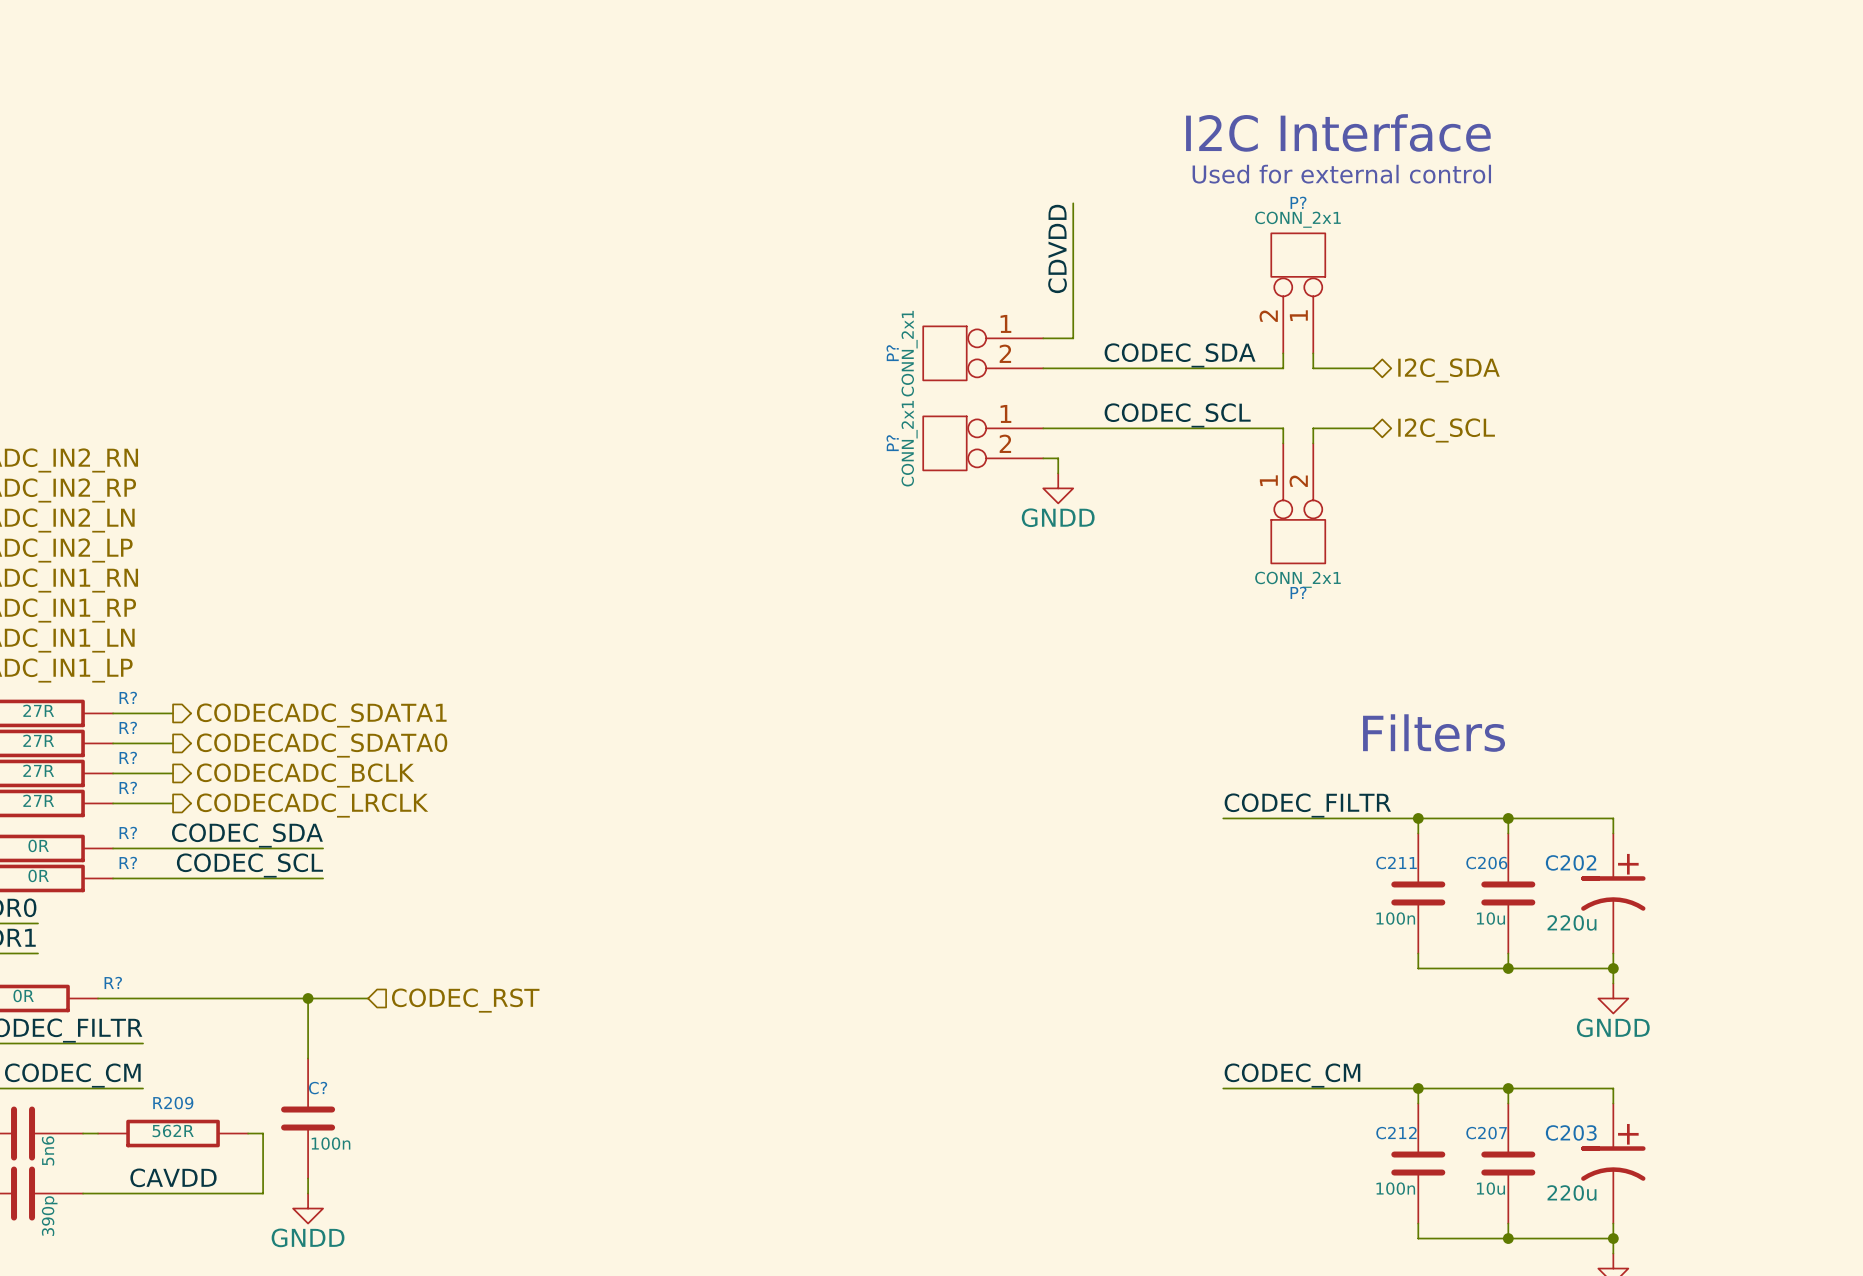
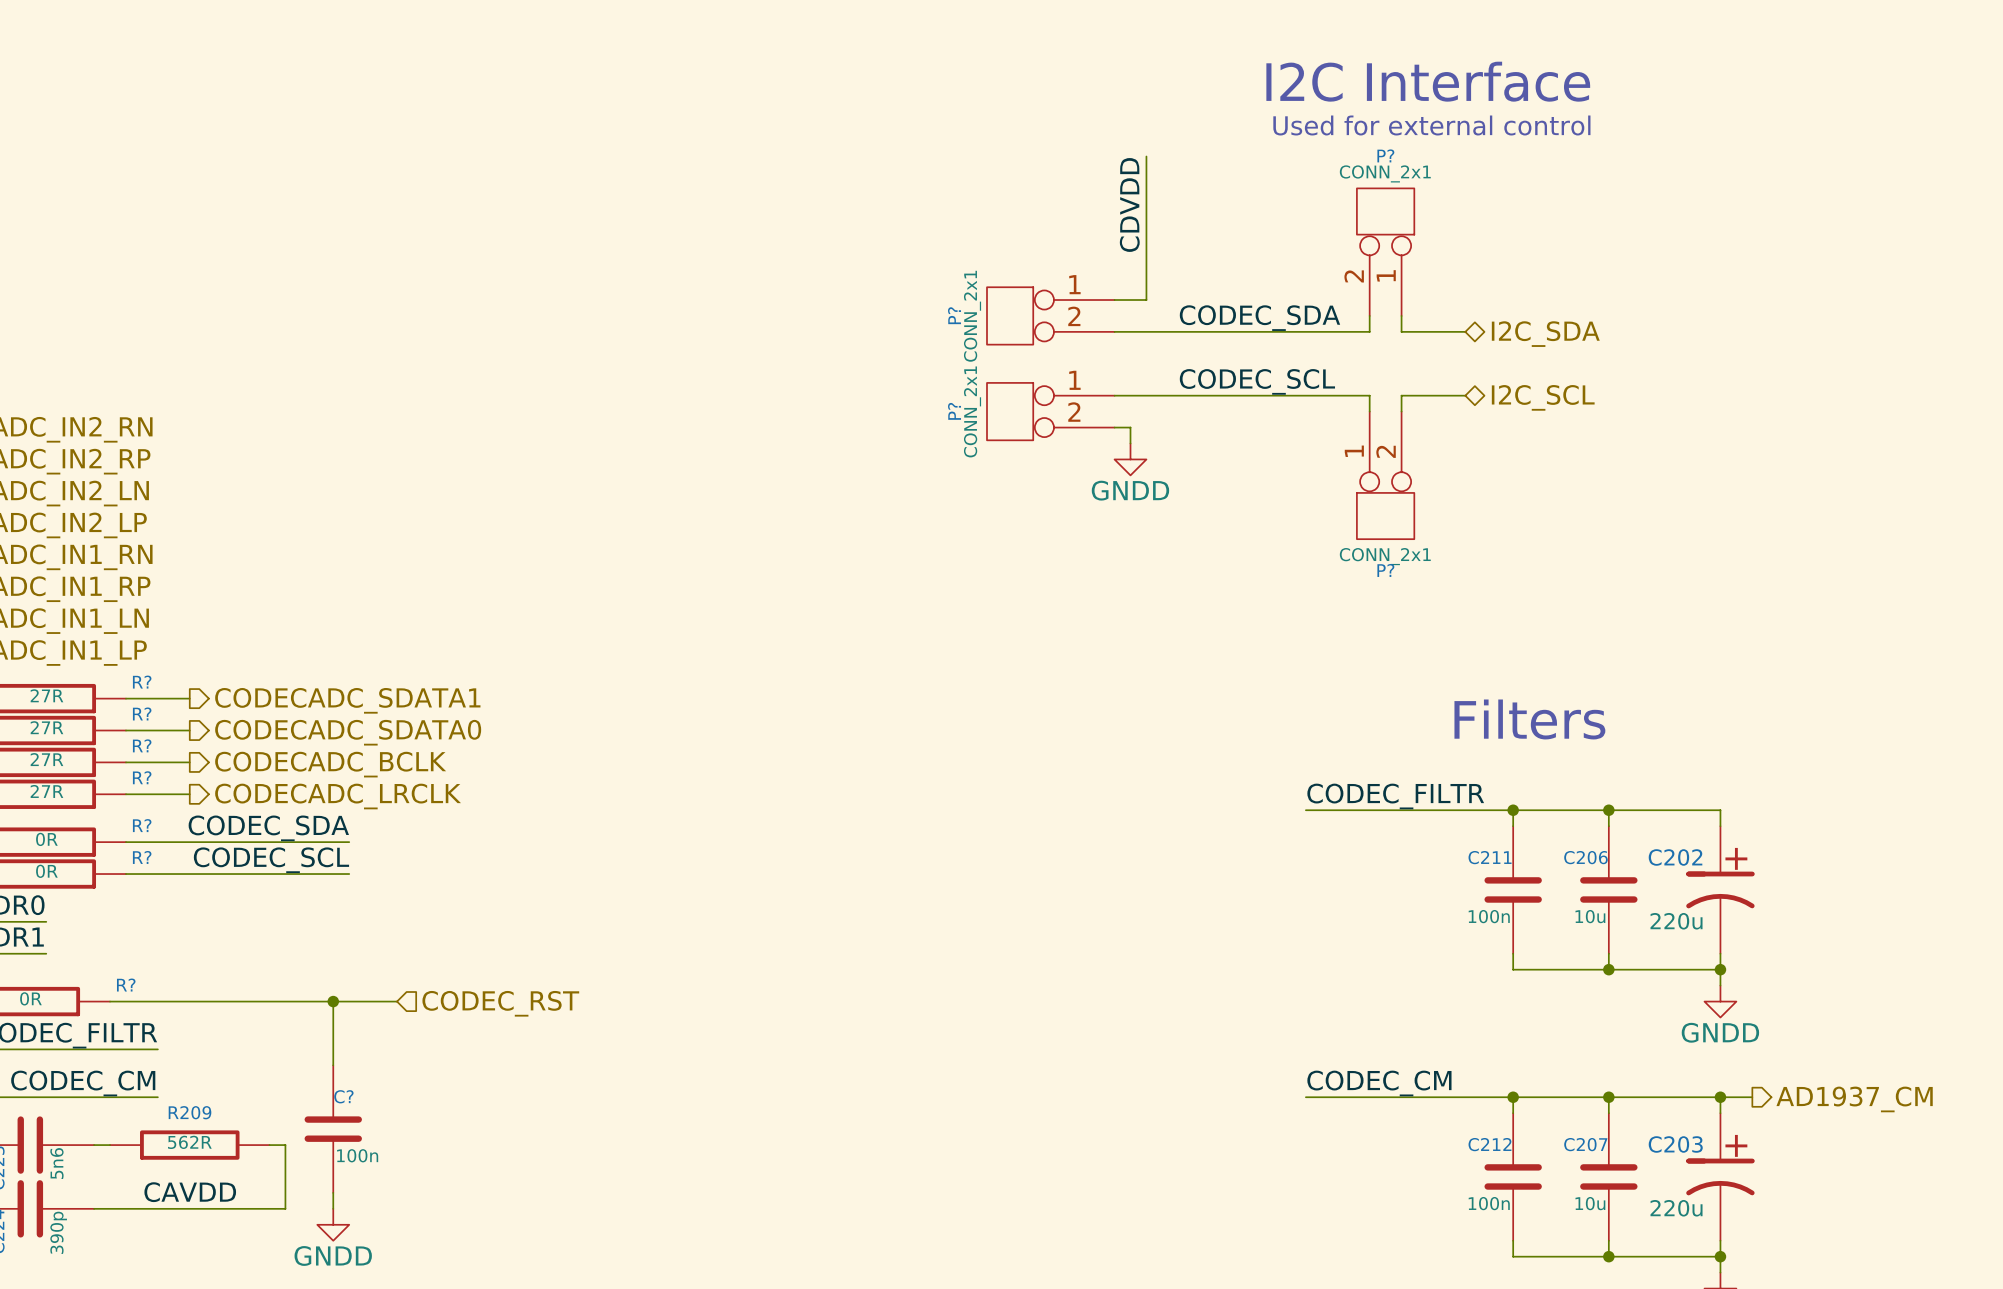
wire: none -> (1720, 1097) (1752, 1097)
junction: none -> (1720, 1097)
hierarchical label: none -> AD1937_CM (1854, 1099)

